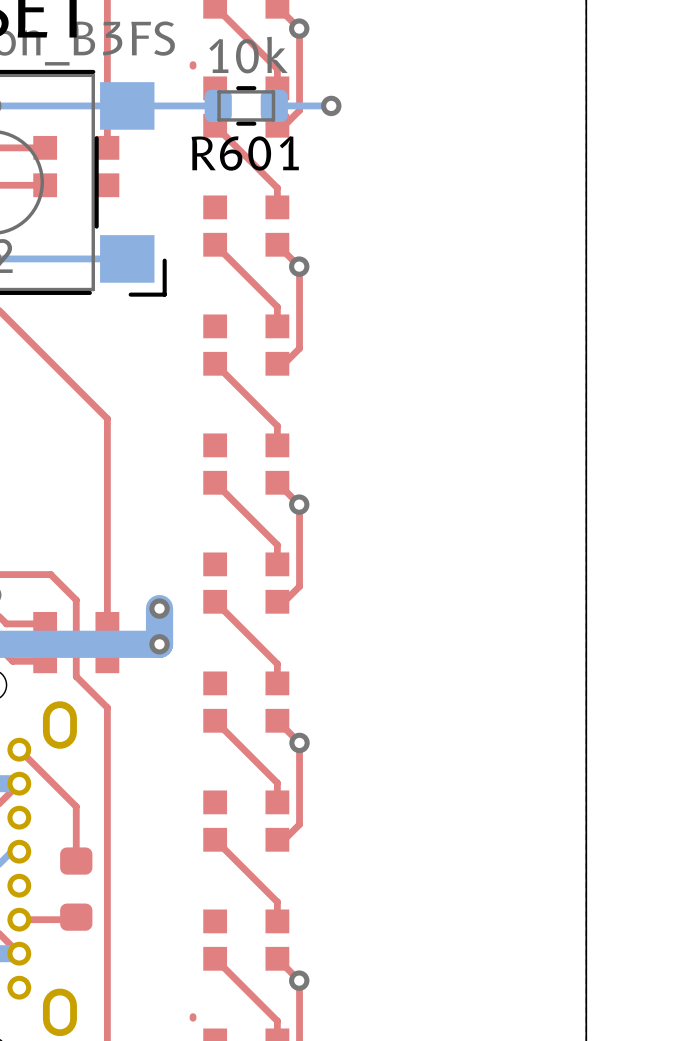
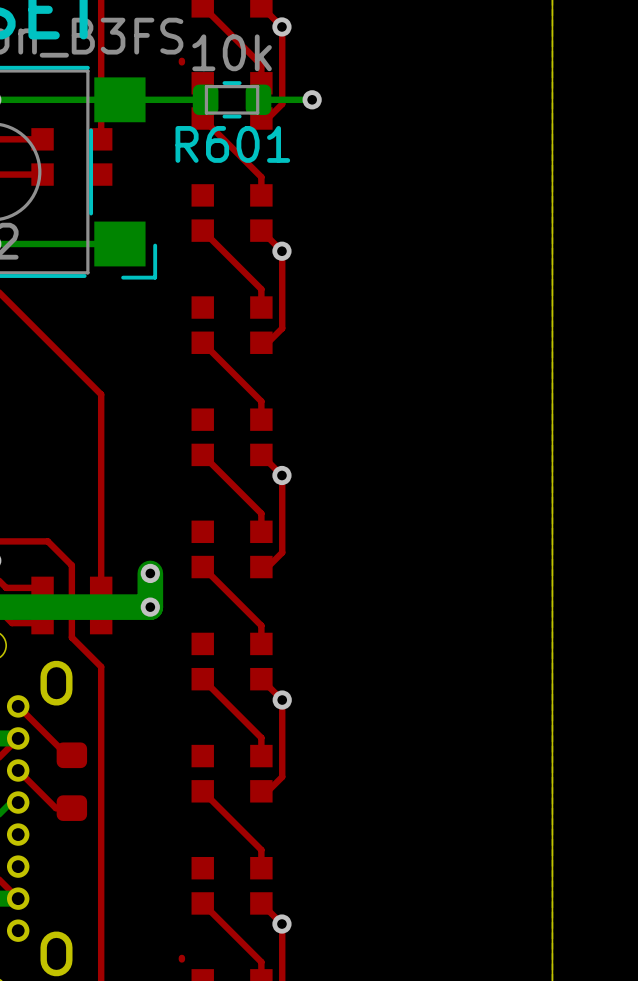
top track: (76, 806) (76, 861) -> none
top track: none -> (18, 770) (55, 808) (71, 808)
part position: (76, 889) -> (71, 781)
top track: (76, 917) (73, 919) (19, 919) -> none

